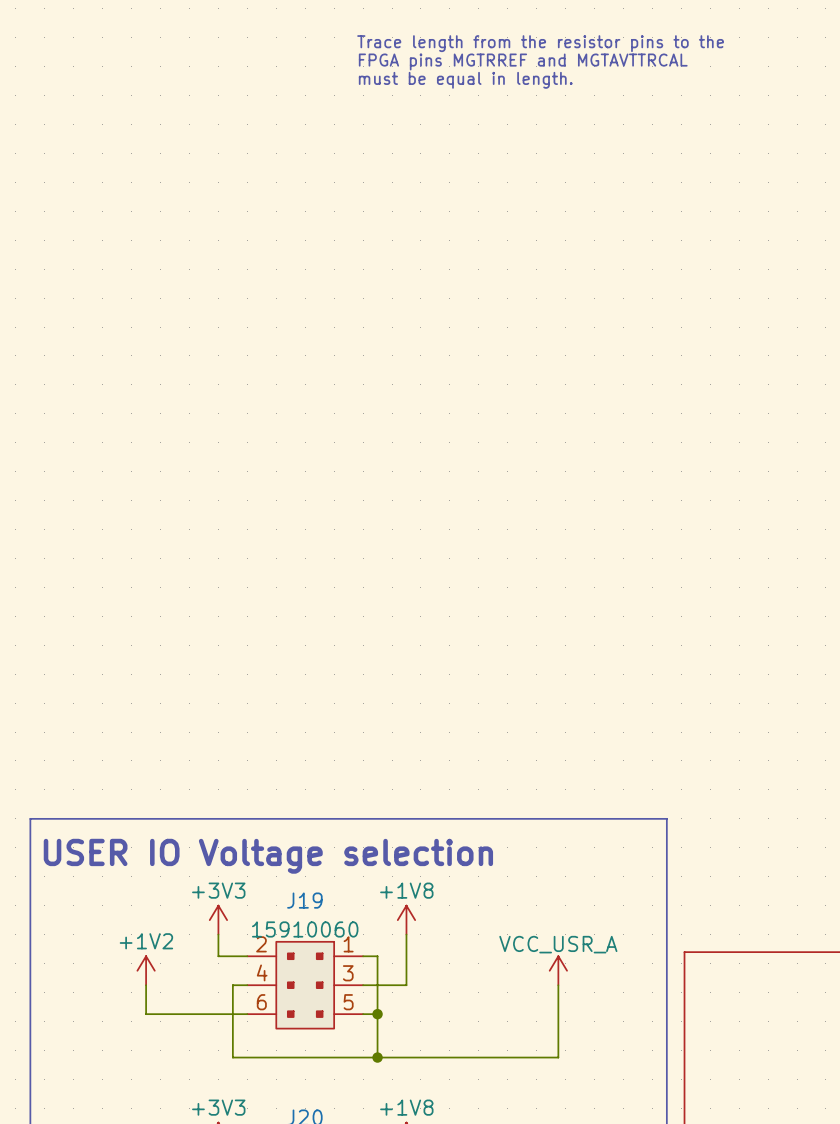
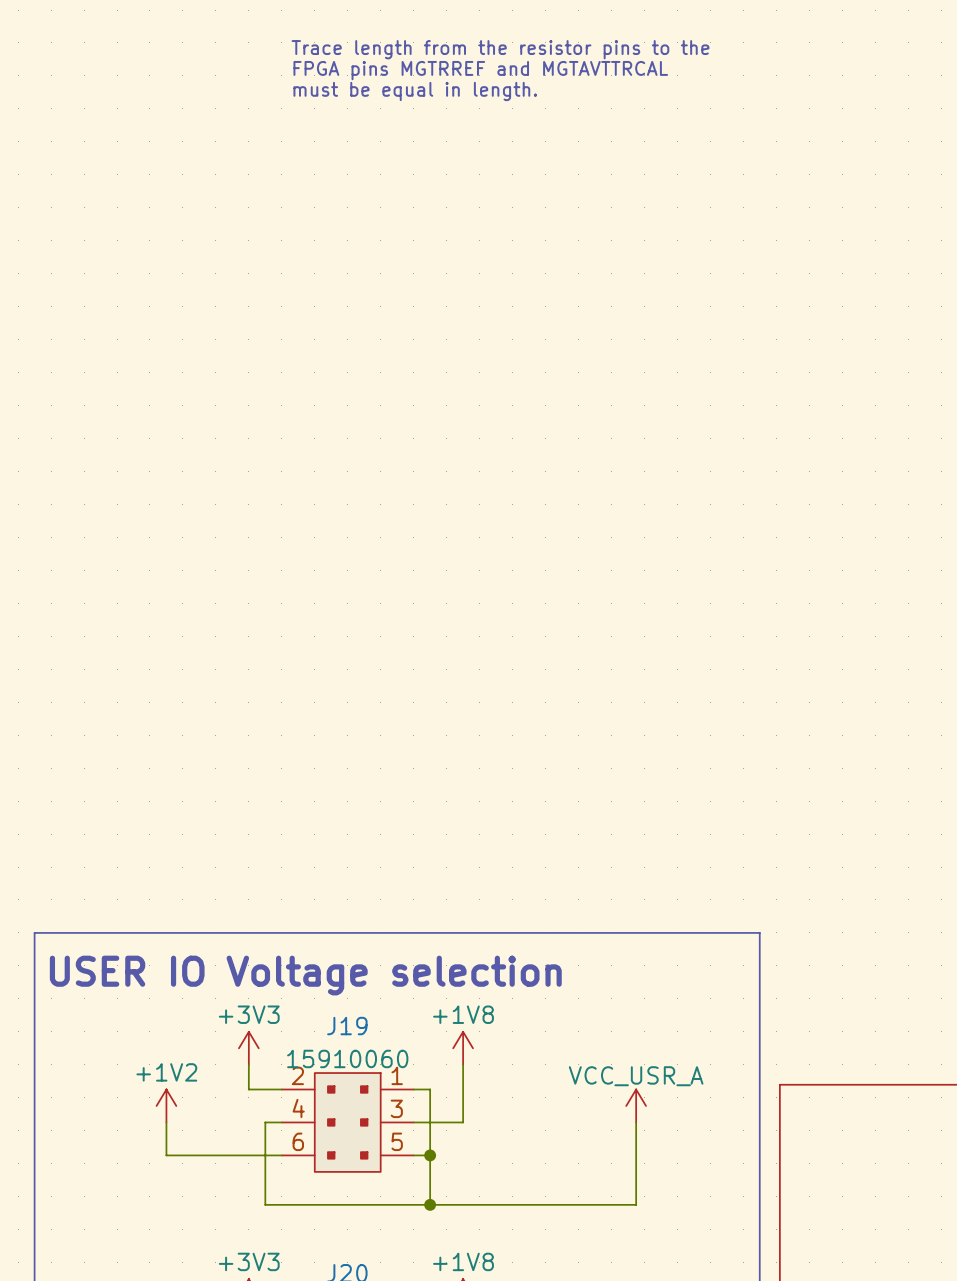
text position: Trace length from the resistor pins to the (540, 43) -> Trace length from the resistor pins to the (500, 49)
text position: FPGA pins MGTRREF and MGTAVTTRCAL (523, 61) -> FPGA pins MGTRREF and MGTAVTTRCAL (480, 70)
text position: must be equal in length. (465, 80) -> must be equal in length. (415, 91)

